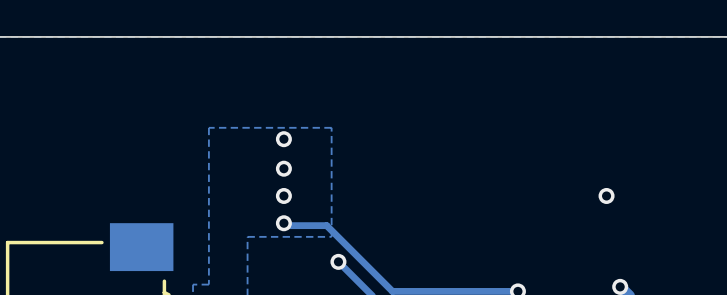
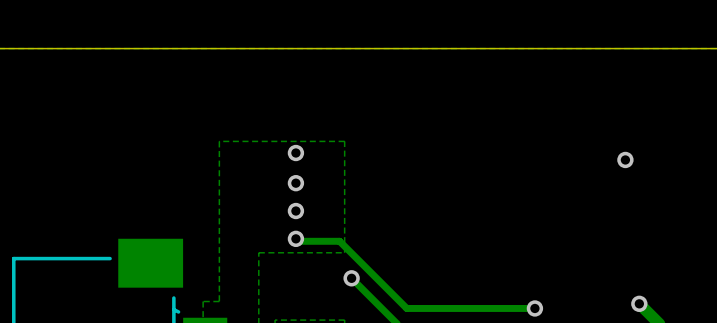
via position: (606, 195) -> (625, 159)

